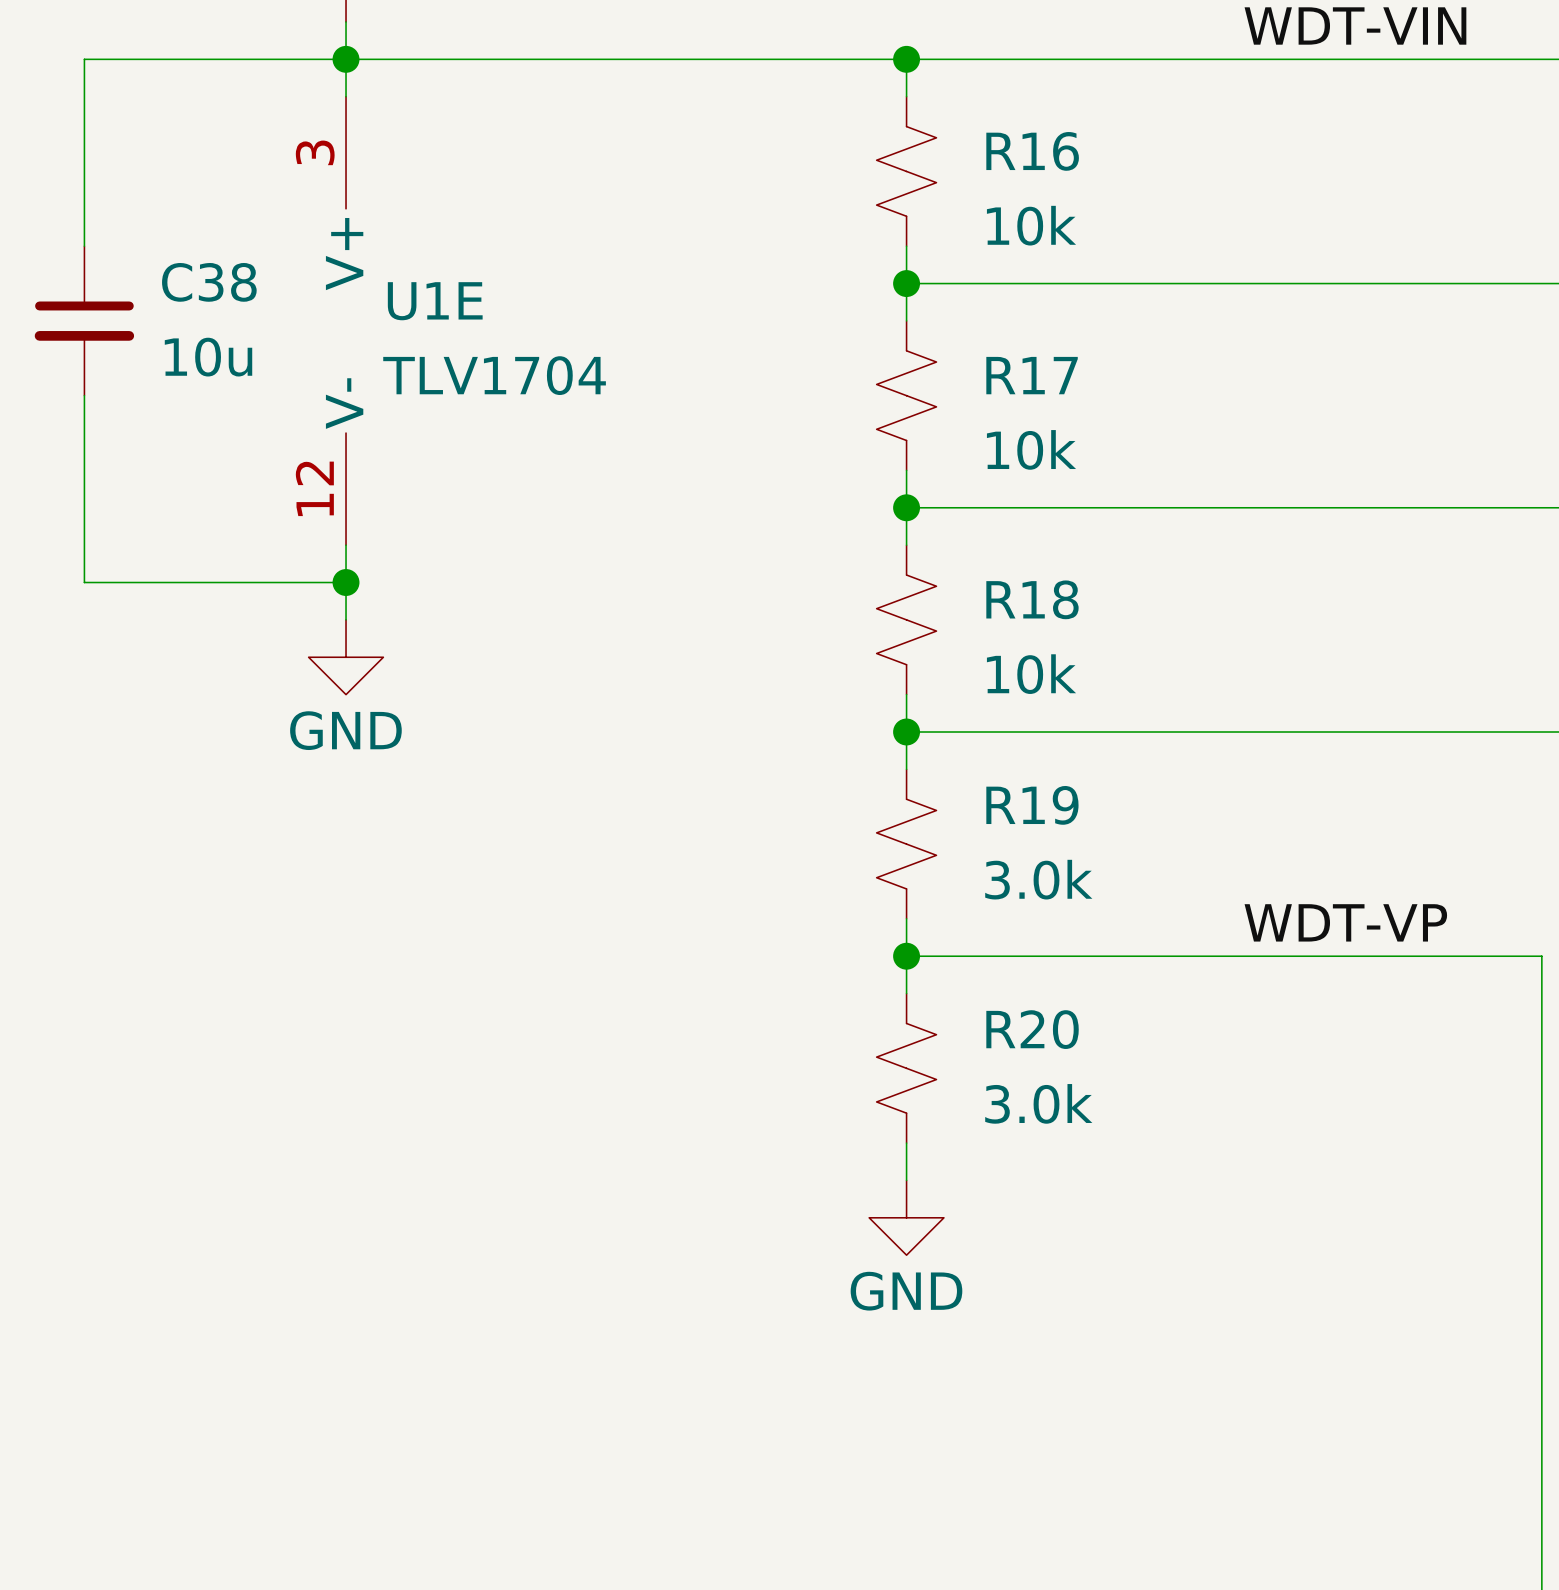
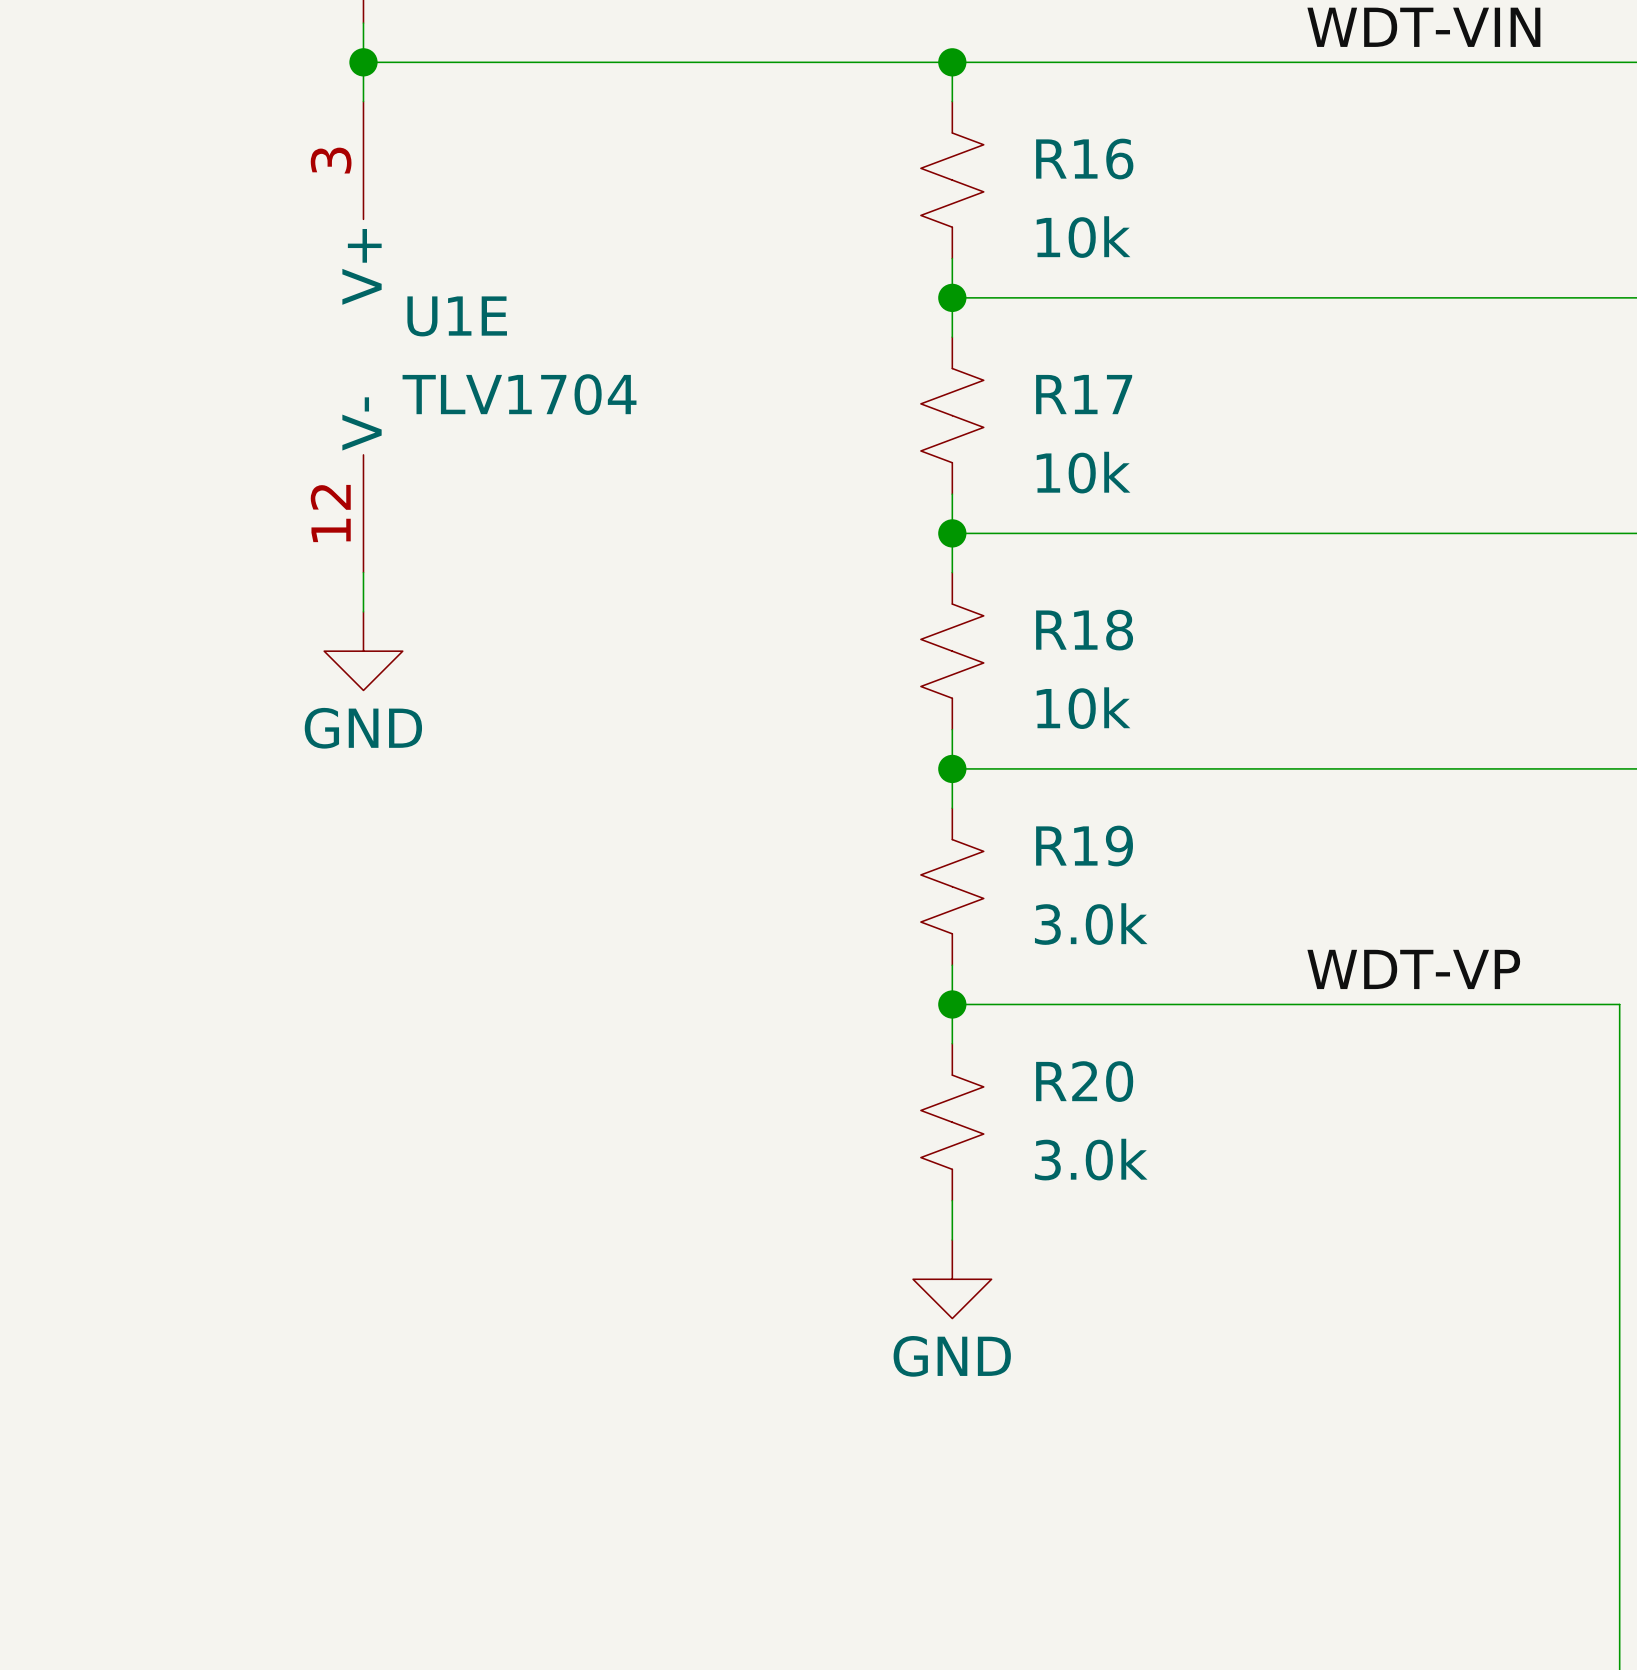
wire: (346, 59) (84, 59) (84, 246) -> none
C38: 10u (84, 320) -> none
wire: (84, 395) (84, 582) (346, 582) (346, 619) -> none
junction: (346, 582) -> none
power symbol position: GND (346, 657) -> GND (363, 651)

